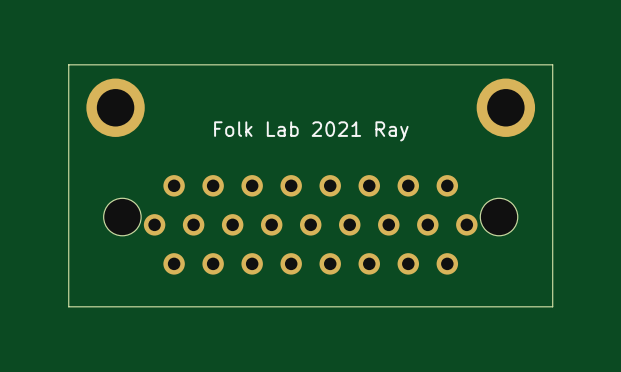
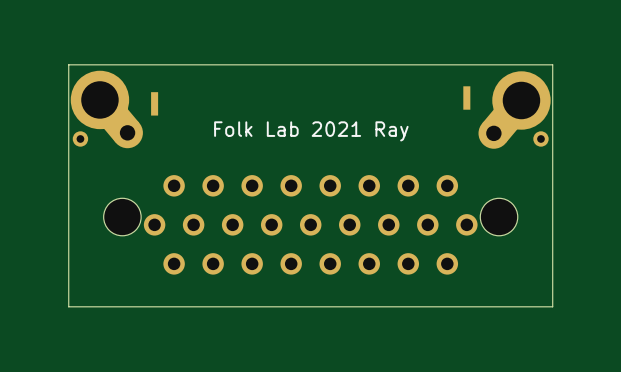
part footprint: [86, 78, 145, 137] -> [70, 70, 143, 149]
part footprint: [476, 78, 536, 137] -> [478, 71, 551, 149]
part: none -> (466, 98)
part: none -> (154, 103)
part: none -> (80, 138)
part: none -> (540, 138)

